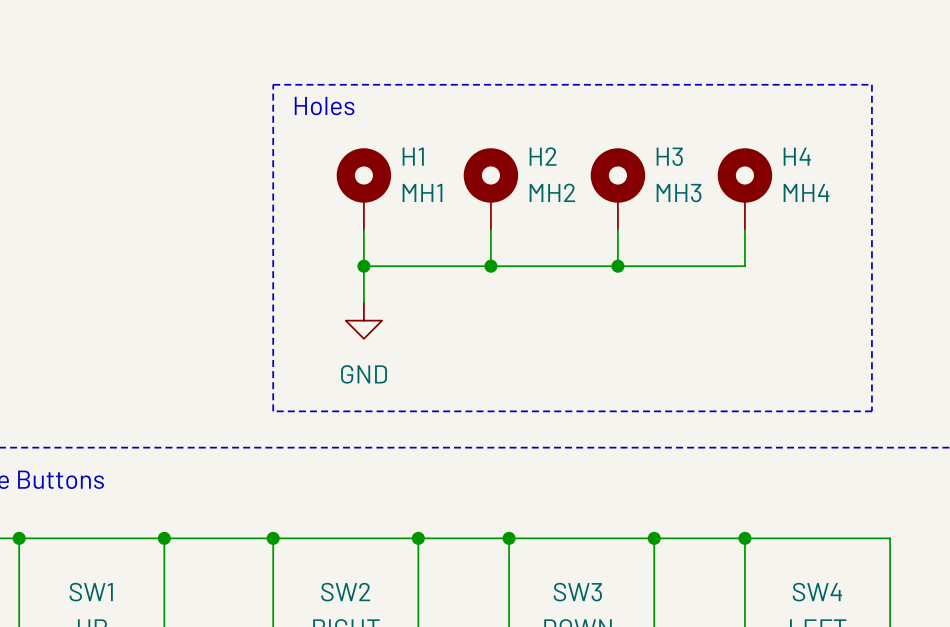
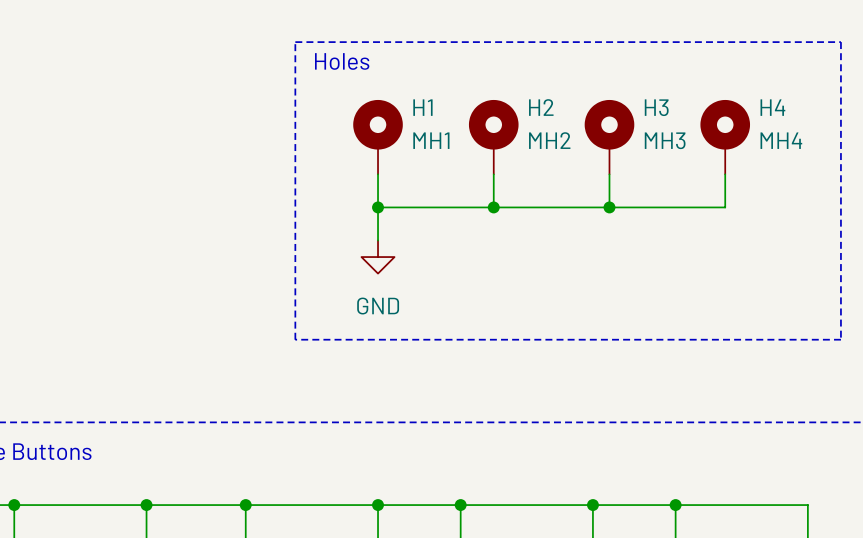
line: (273, 84) (871, 84) (871, 411) (273, 411) (273, 84) -> (295, 42) (840, 42) (840, 339) (295, 339) (295, 42)
text position: Holes (324, 106) -> Holes (342, 61)
H1 position: (363, 189) -> (378, 137)
H2 position: (490, 189) -> (493, 137)
H3 position: (617, 189) -> (609, 137)
H4 position: (744, 189) -> (725, 137)
junction: none -> (378, 207)
junction: none -> (493, 207)
junction: none -> (609, 207)
wire: (363, 229) (363, 302) -> (378, 174) (378, 240)
wire: (490, 229) (490, 266) -> (493, 174) (493, 207)
wire: (617, 229) (617, 266) -> (609, 174) (609, 207)
wire: (744, 229) (744, 266) (363, 266) -> (725, 174) (725, 207) (378, 207)
junction: (363, 266) -> none
junction: (490, 266) -> none
junction: (617, 266) -> none
power symbol position: GND (363, 320) -> GND (378, 257)

